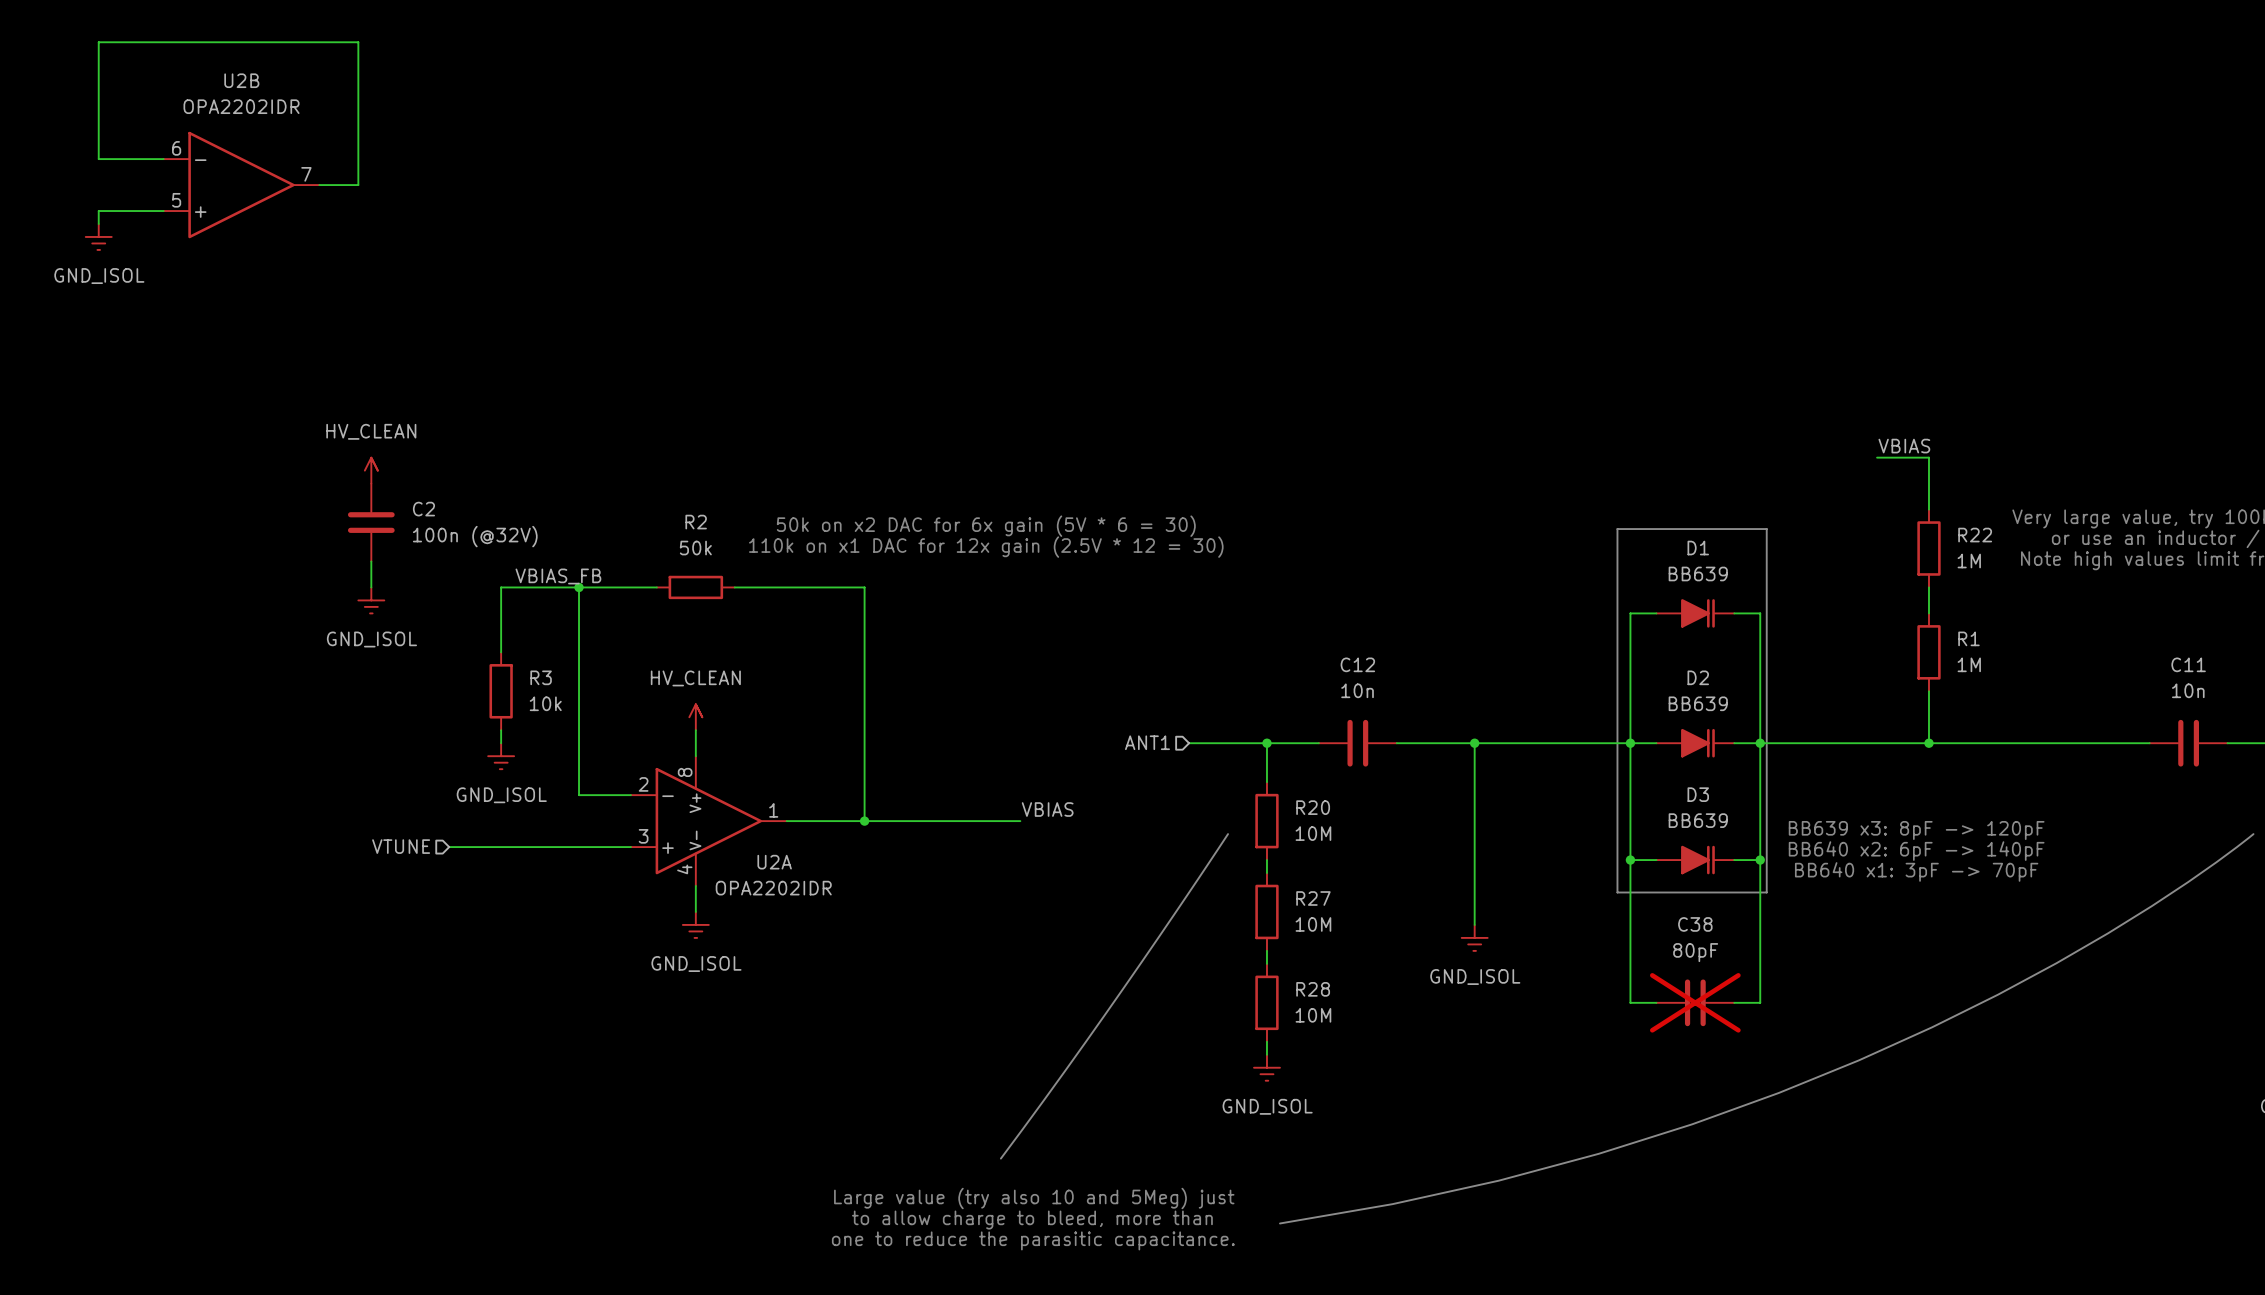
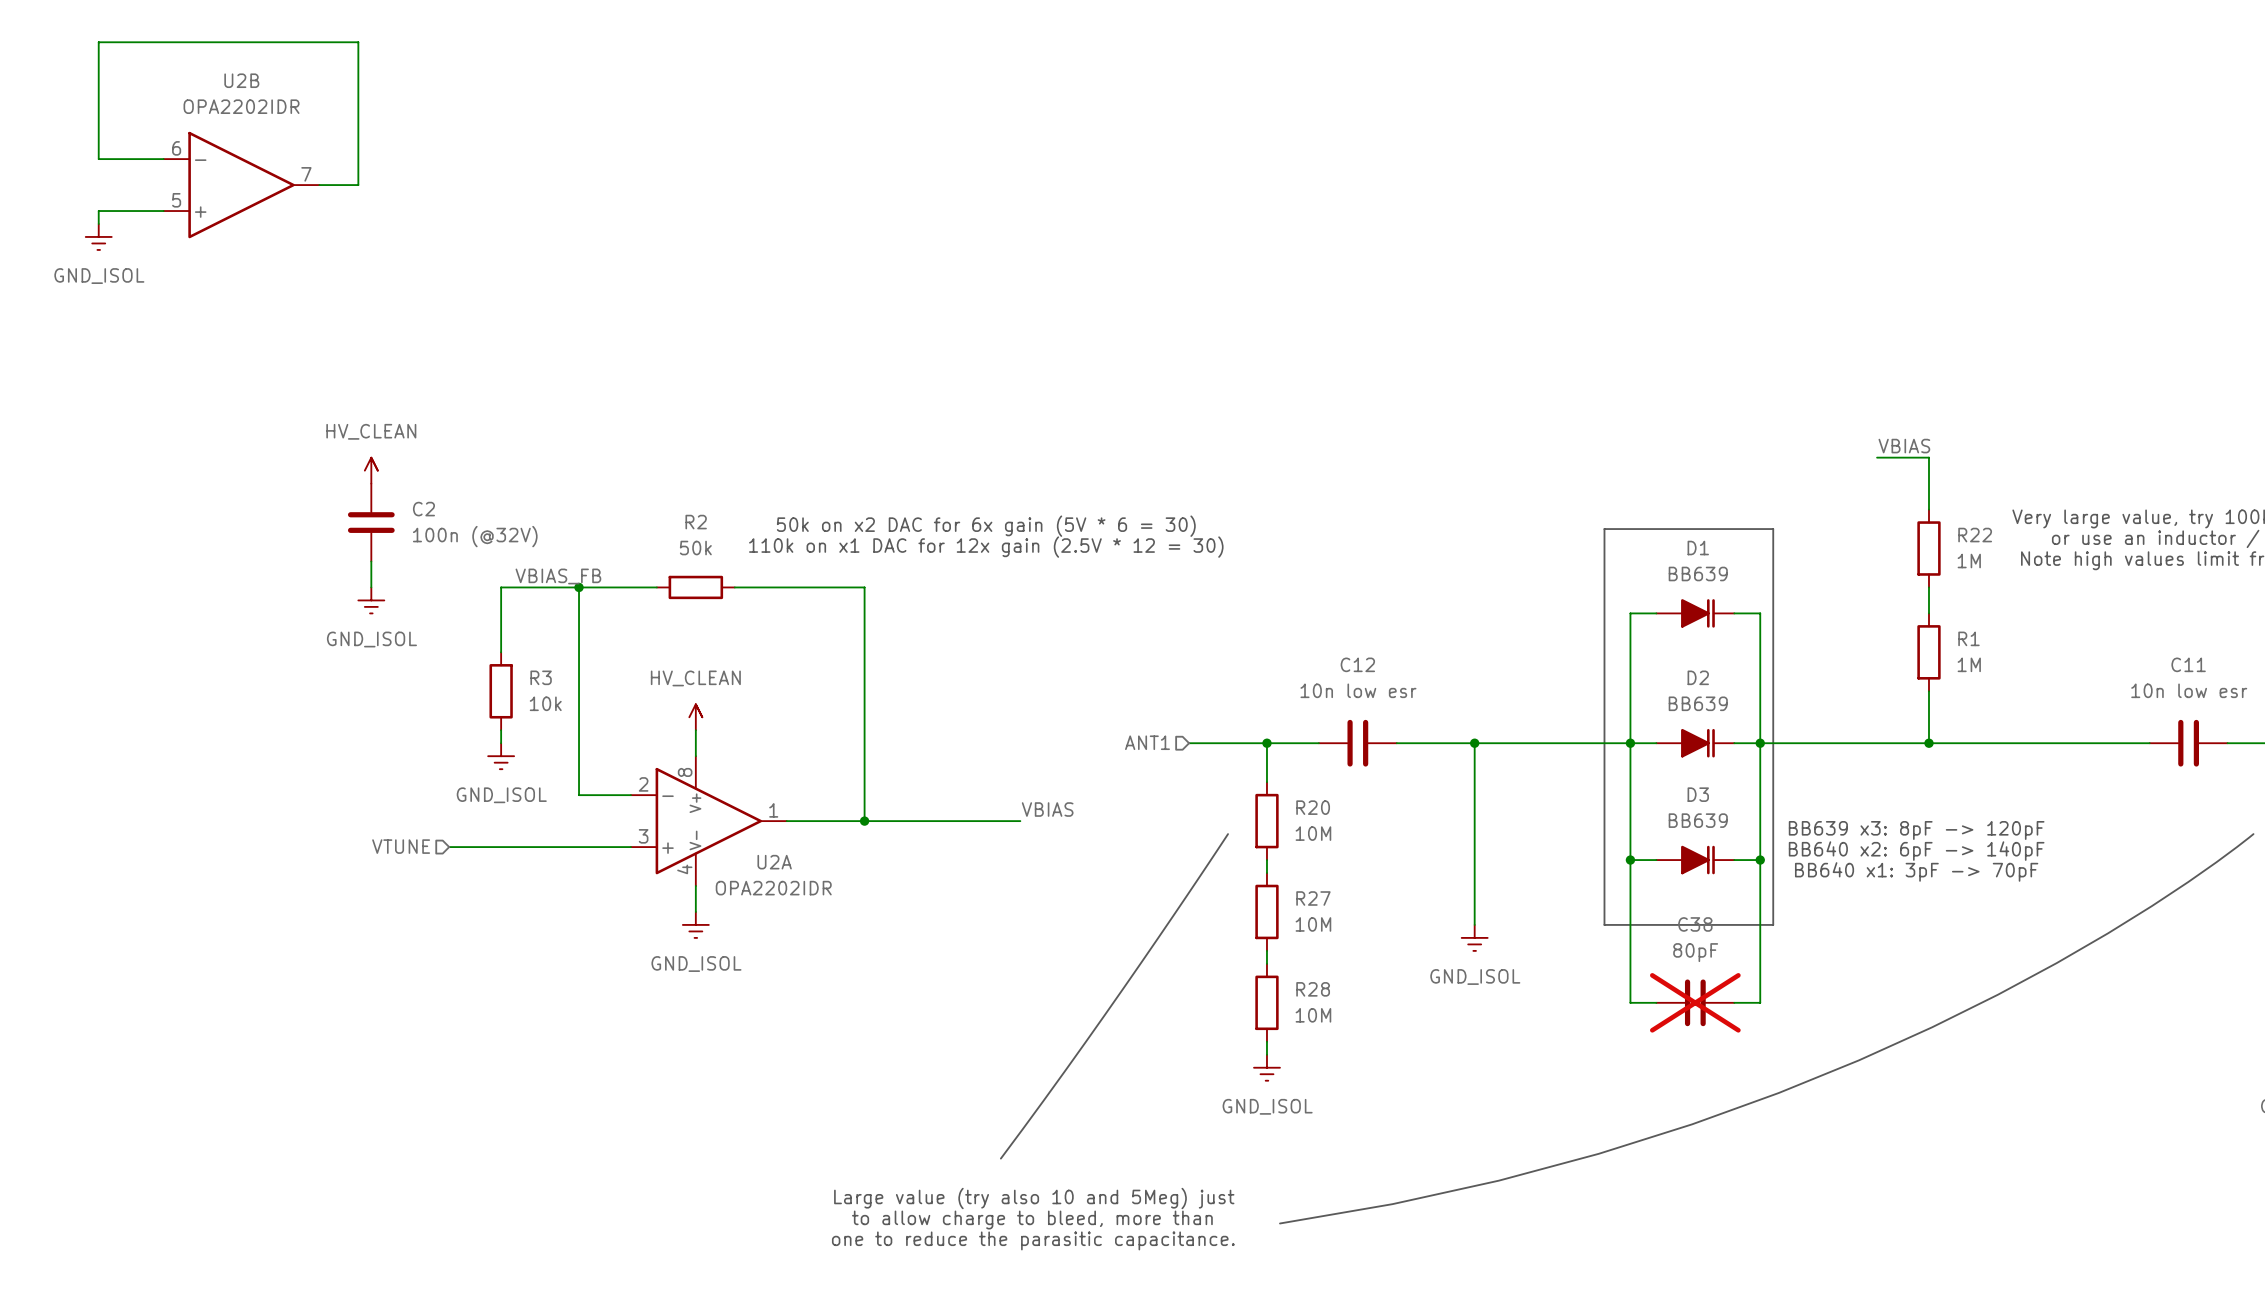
line: (1617, 529) (1617, 892) (1766, 892) (1766, 529) -> (1617, 529) (1604, 529) (1604, 924) (1773, 924) (1773, 529) (1766, 529)
C12 value: 10n (1357, 690) -> 10n low esr (1358, 690)
C11 value: 10n (2188, 690) -> 10n low esr (2189, 690)

